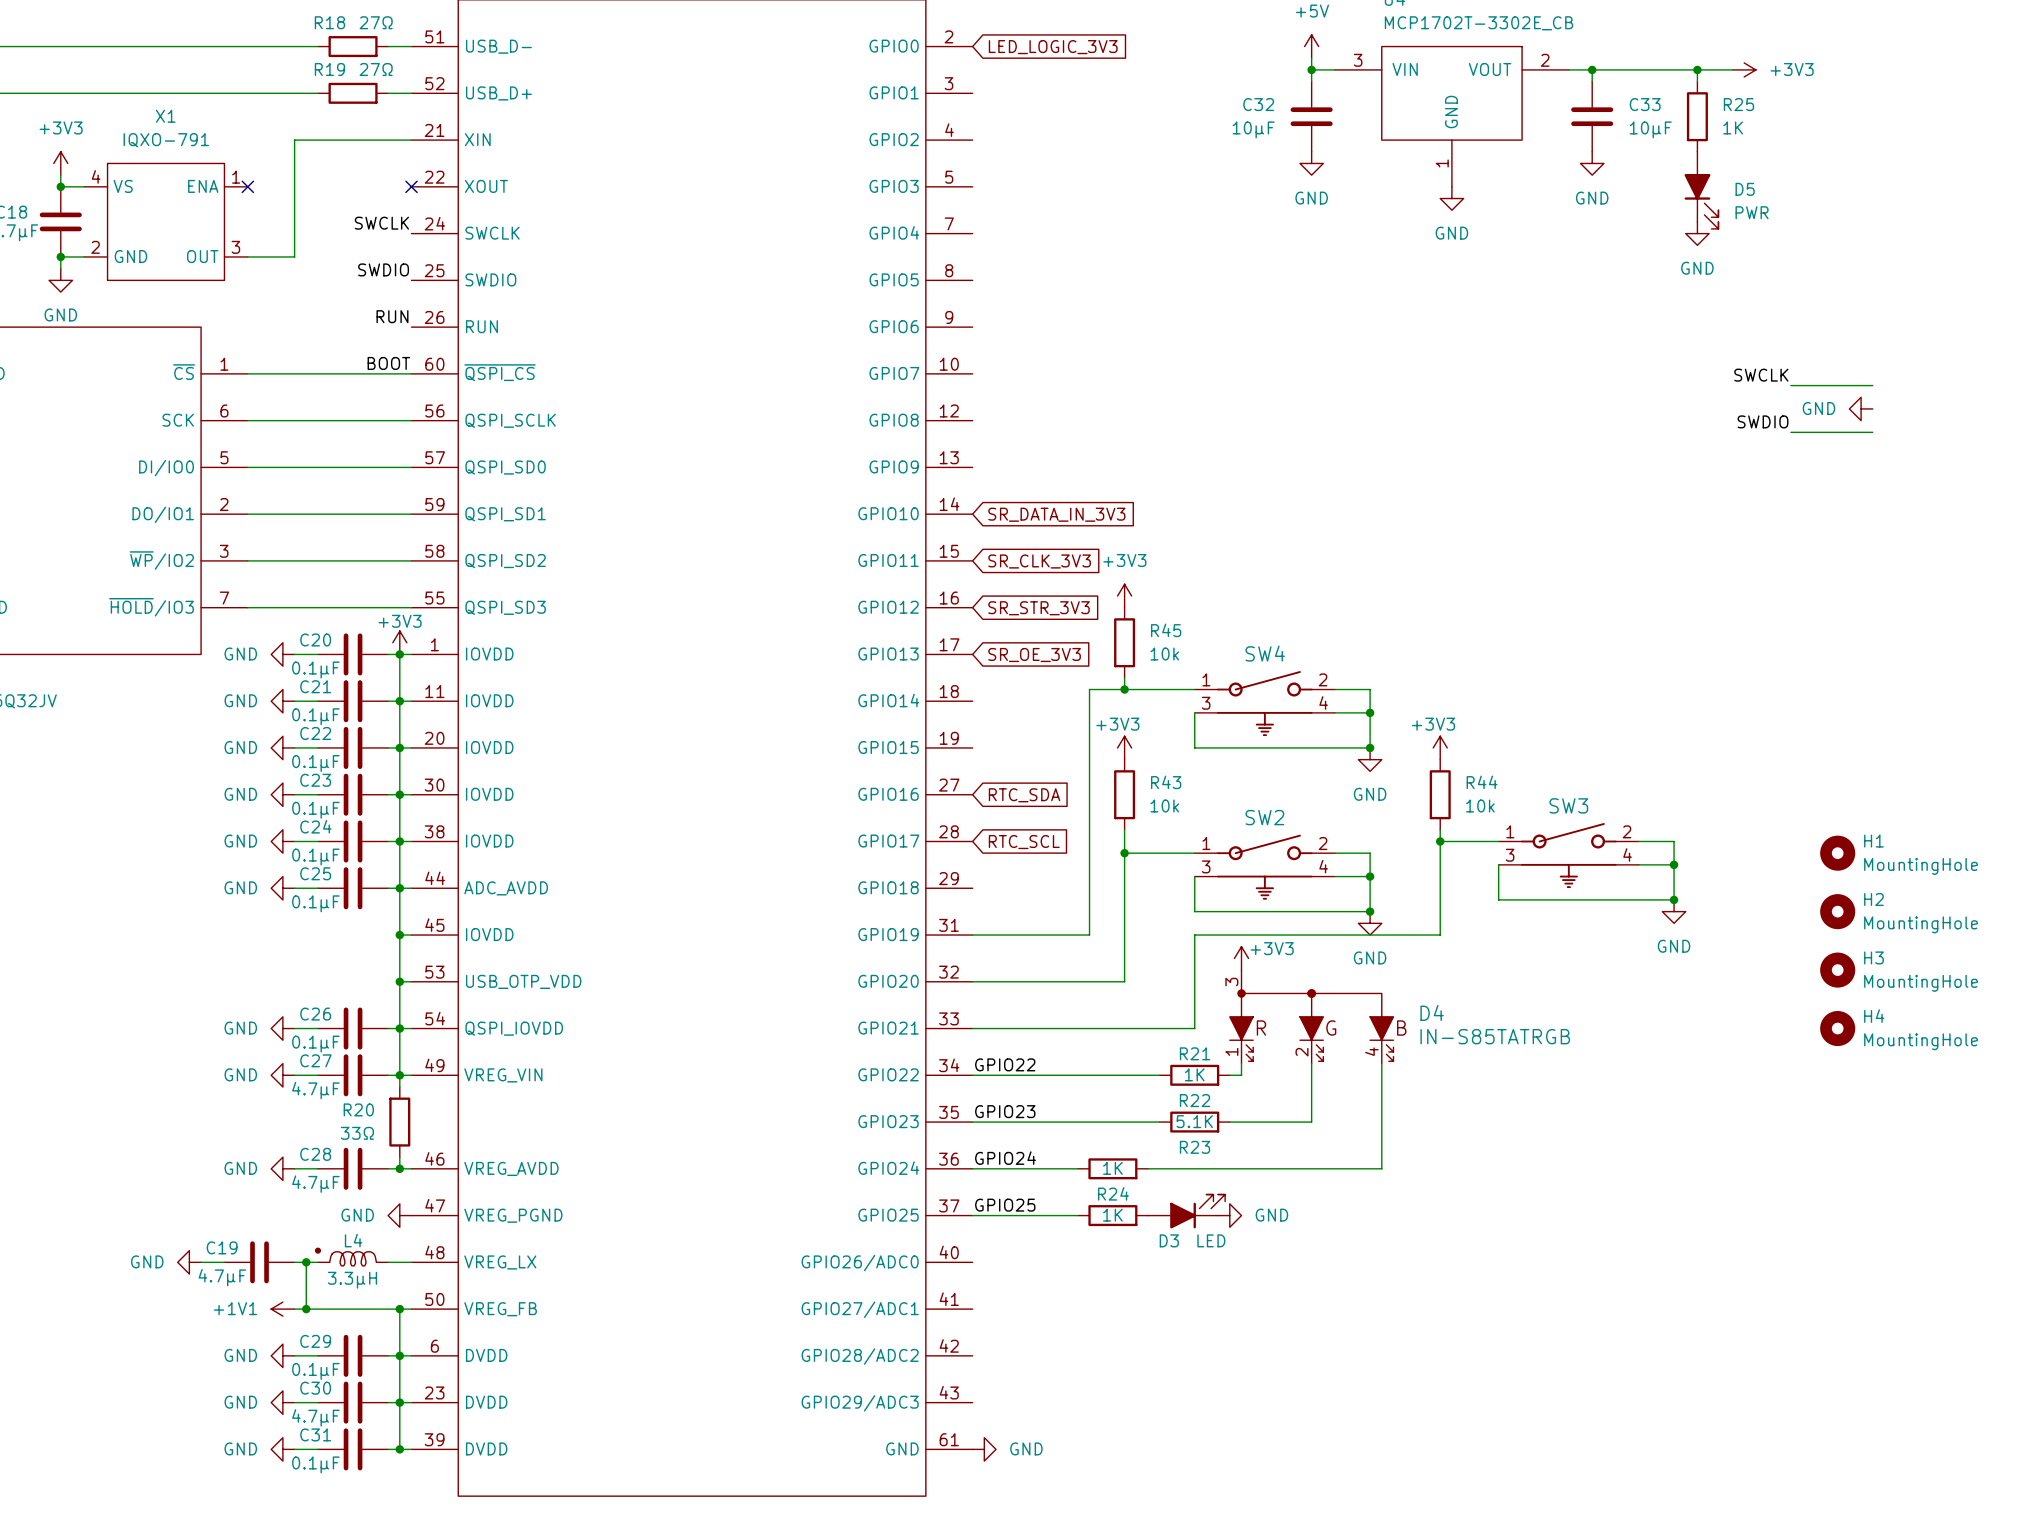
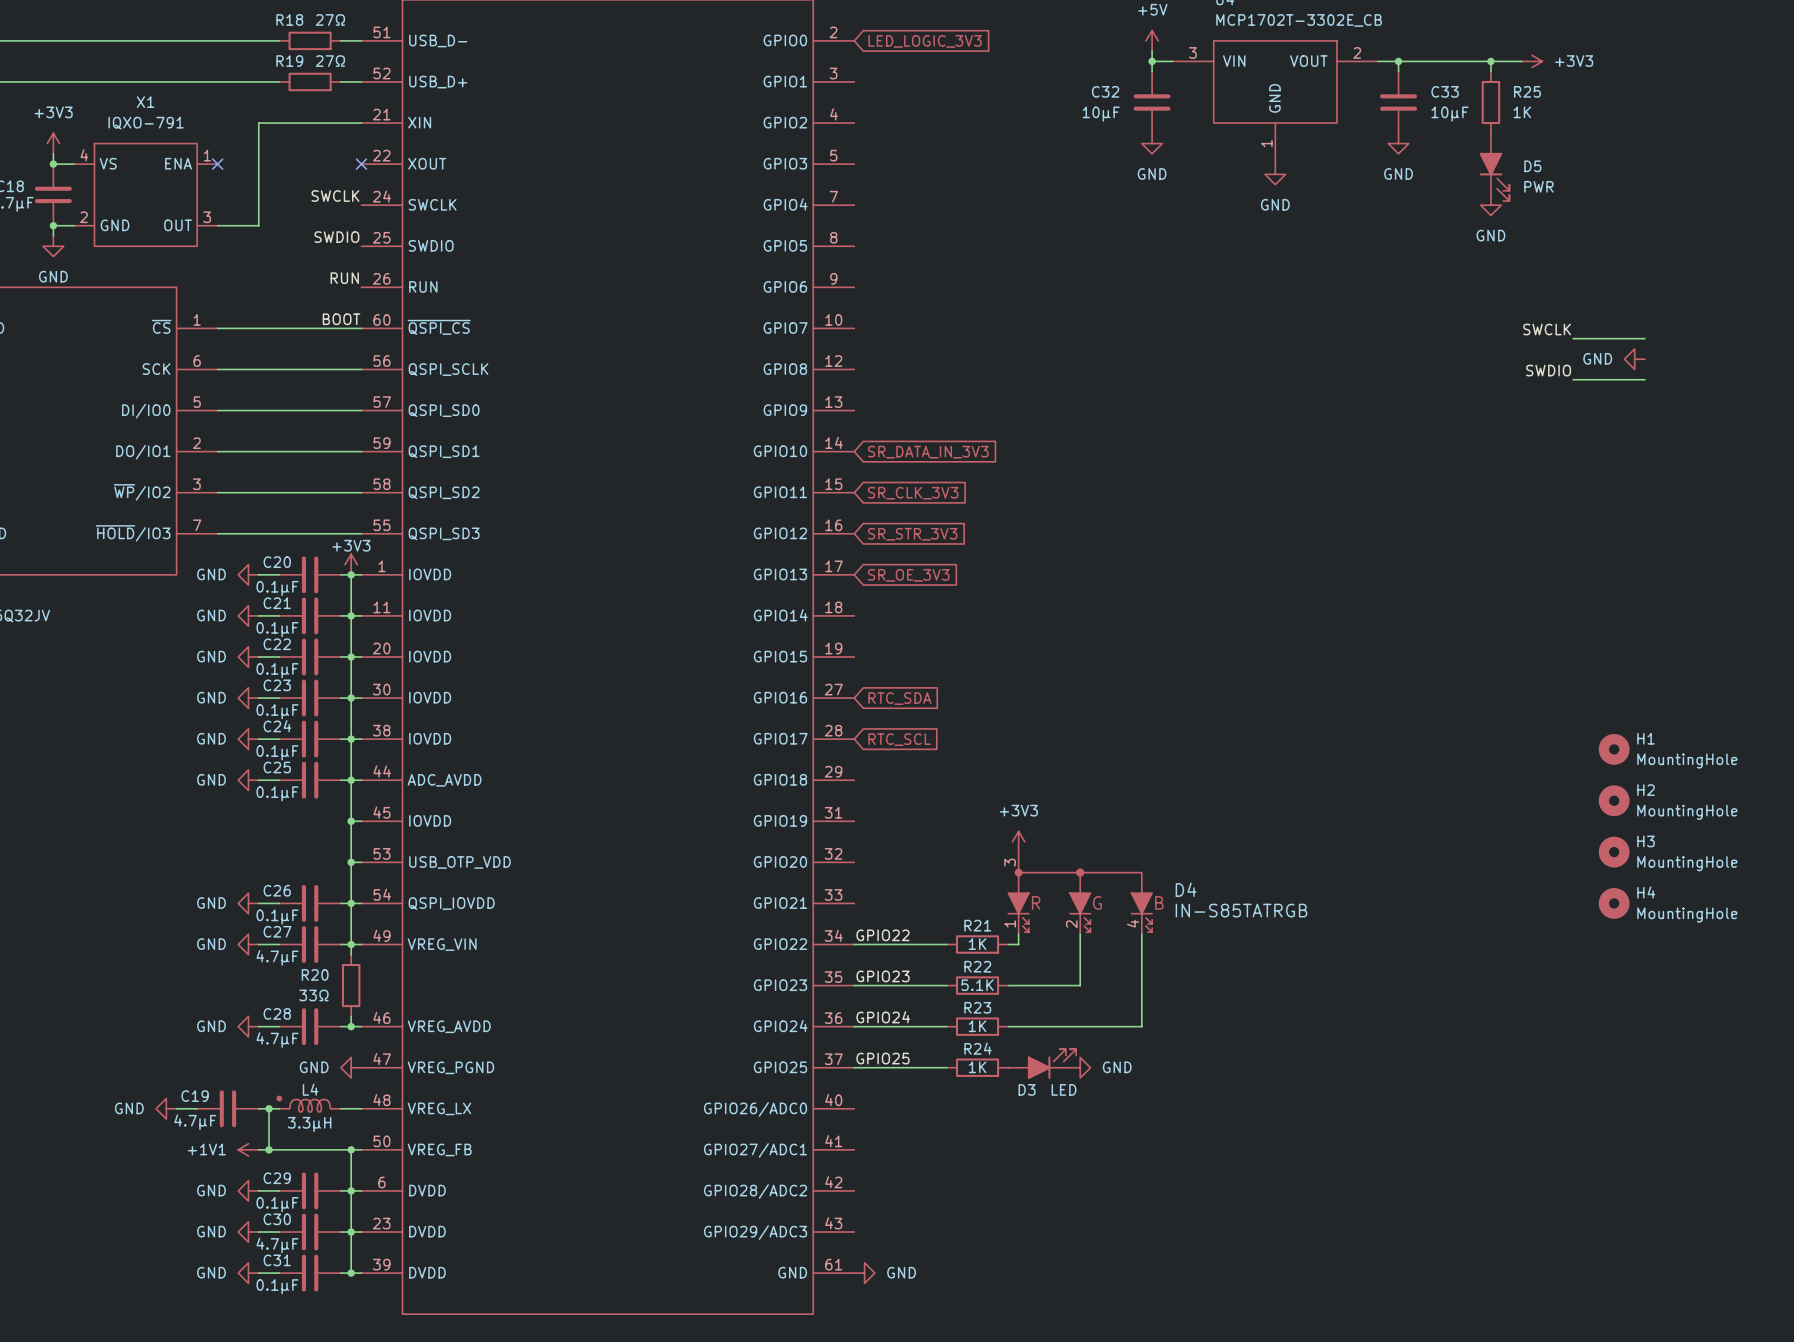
power symbol: +3V3 (1124, 596) -> none
R45: 10k (1124, 642) -> none
wire: (1124, 677) (1124, 689) -> none
junction: (1124, 689) -> none
wire: (1194, 689) (1089, 689) (1089, 935) (972, 935) -> none
wire: (1335, 689) (1370, 689) (1370, 747) (1194, 747) (1194, 712) -> none
SW4: (1264, 703) -> none
wire: (1335, 712) (1370, 712) -> none
junction: (1370, 712) -> none
power symbol: +3V3 (1124, 747) -> none
junction: (1370, 747) -> none
power symbol: +3V3 (1440, 747) -> none
power symbol: GND (1370, 759) -> none
R43: 10k (1124, 794) -> none
R44: 10k (1440, 794) -> none
wire: (1124, 829) (1124, 981) (972, 981) -> none
wire: (1440, 829) (1440, 935) (1194, 935) (1194, 1028) (972, 1028) -> none
wire: (1440, 841) (1498, 841) -> none
junction: (1440, 841) -> none
wire: (1638, 841) (1674, 841) (1674, 899) (1498, 899) (1498, 864) -> none
wire: (1124, 853) (1194, 853) -> none
junction: (1124, 853) -> none
wire: (1335, 853) (1370, 853) (1370, 911) (1194, 911) (1194, 876) -> none
SW3: (1568, 855) -> none
wire: (1638, 864) (1674, 864) -> none
junction: (1674, 864) -> none
SW2: (1264, 867) -> none
wire: (1335, 876) (1370, 876) -> none
junction: (1370, 876) -> none
junction: (1674, 899) -> none
junction: (1370, 911) -> none
power symbol: GND (1674, 911) -> none
power symbol: GND (1370, 923) -> none
power symbol text position: +3V3 (1272, 948) -> +3V3 (1018, 810)
power symbol position: +3V3 (1241, 958) -> +3V3 (1018, 841)
D4 position: (1311, 1016) -> (1080, 893)
wire: none -> (1018, 934) (1018, 944)
wire: none -> (1080, 934) (1080, 985) (1018, 985)
wire: (1241, 1063) (1241, 1075) (1229, 1075) -> none
wire: (1311, 1063) (1311, 1122) (1229, 1122) -> none
wire: (1381, 1063) (1381, 1168) (1299, 1168) -> (1141, 934) (1141, 1026)
wire: (1077, 1075) (1147, 1075) -> none
R21 position: (1194, 1075) -> (977, 944)
wire: (1077, 1122) (1147, 1122) -> none
R22 position: (1194, 1122) -> (977, 985)
R23 name position: R23 (1195, 1147) -> R23 (977, 1007)

